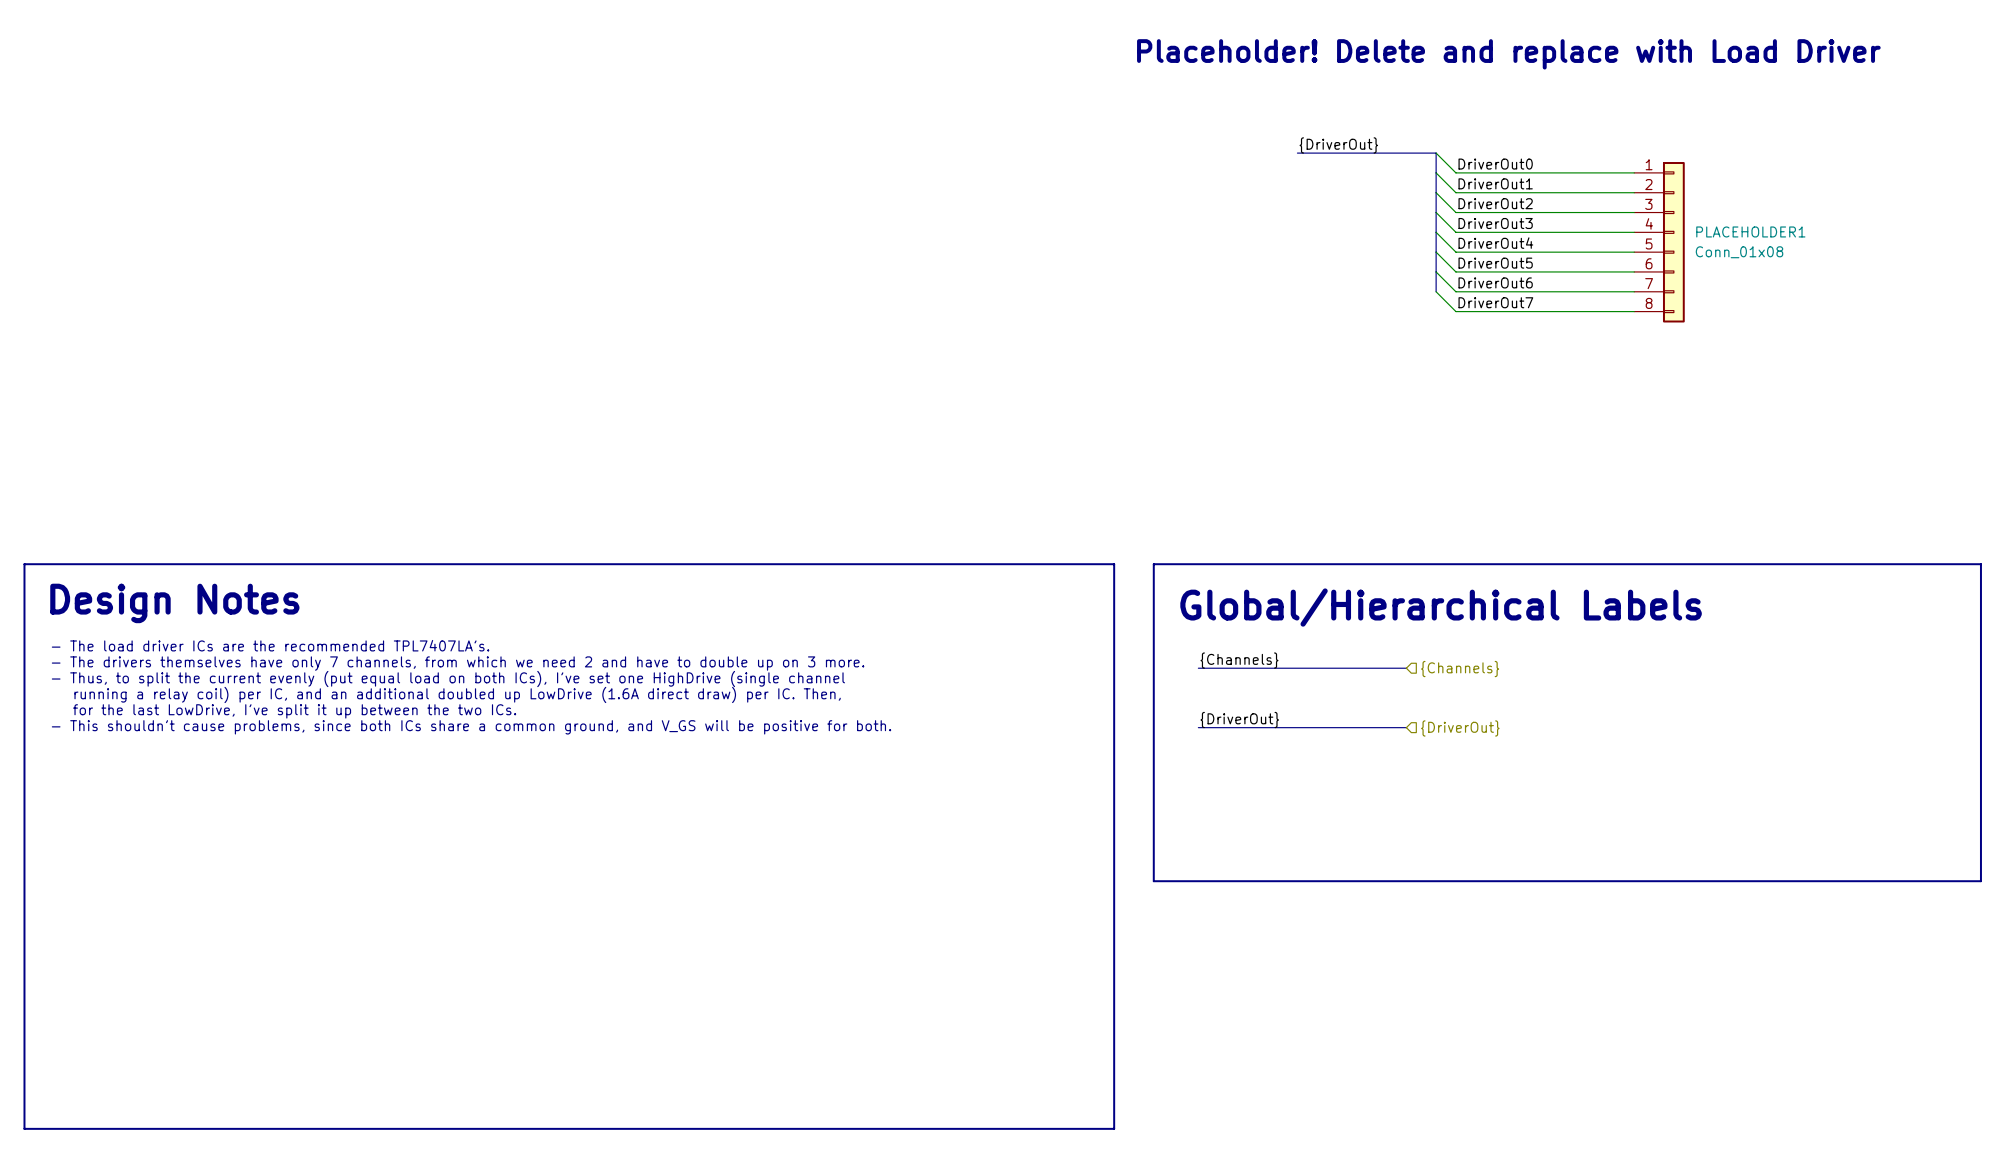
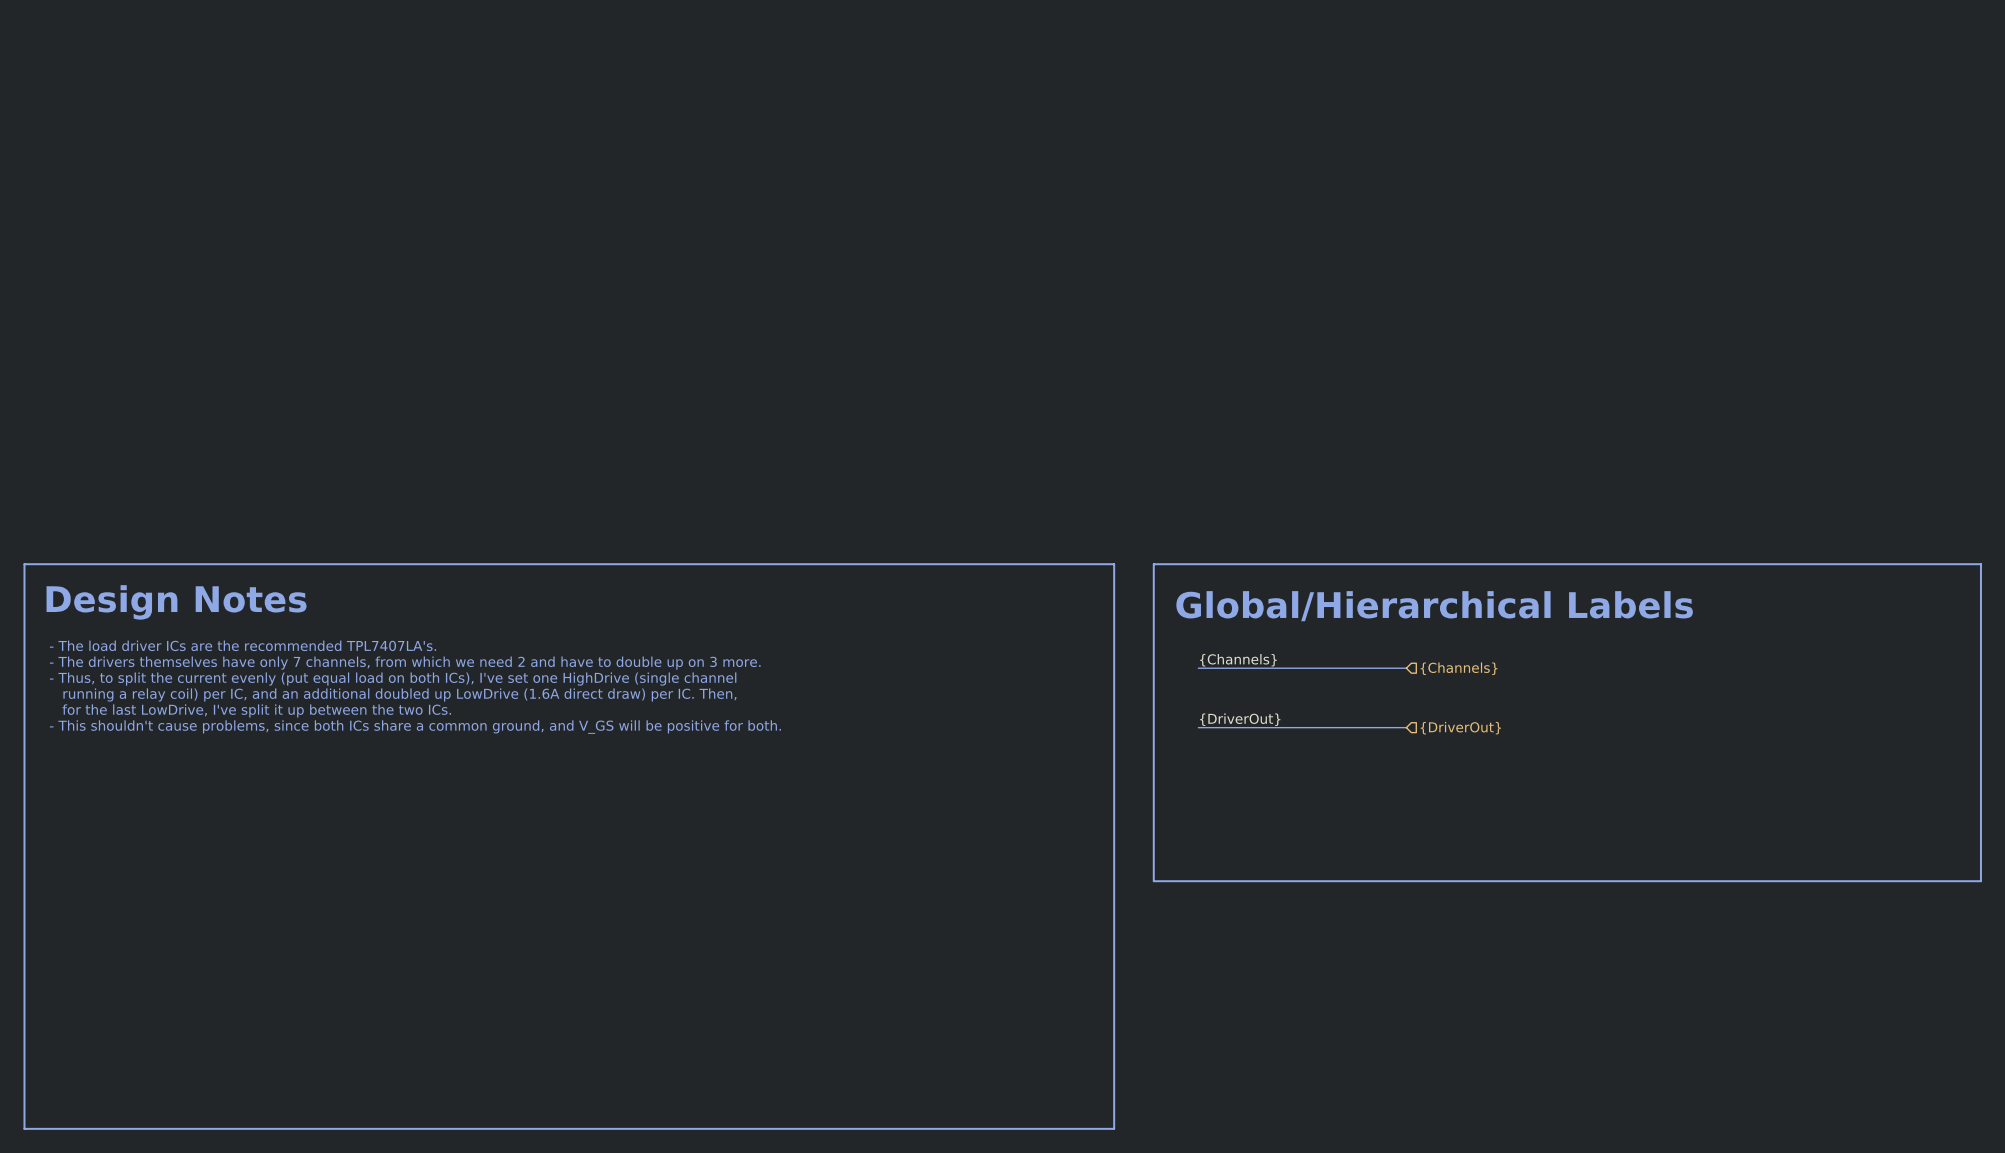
text: Placeholder! Delete and replace with Load Driver (1508, 54) -> none
label: {DriverOut} (1338, 145) -> none
bus: (1297, 153) (1436, 153) (1436, 291) -> none
wire: (1436, 153) (1455, 172) (1634, 172) -> none
label: DriverOut0 (1495, 164) -> none
wire: (1436, 172) (1455, 192) (1634, 192) -> none
label: DriverOut1 (1495, 183) -> none
wire: (1436, 192) (1455, 212) (1634, 212) -> none
label: DriverOut2 (1495, 203) -> none
wire: (1436, 212) (1455, 232) (1634, 232) -> none
label: DriverOut3 (1495, 223) -> none
wire: (1436, 232) (1455, 252) (1634, 252) -> none
PLACEHOLDER1: Conn_01x08 (1659, 242) -> none
label: DriverOut4 (1495, 243) -> none
wire: (1436, 252) (1455, 271) (1634, 271) -> none
label: DriverOut5 (1495, 263) -> none
wire: (1436, 271) (1455, 291) (1634, 291) -> none
label: DriverOut6 (1495, 282) -> none
wire: (1436, 291) (1455, 311) (1634, 311) -> none
label: DriverOut7 (1495, 302) -> none

